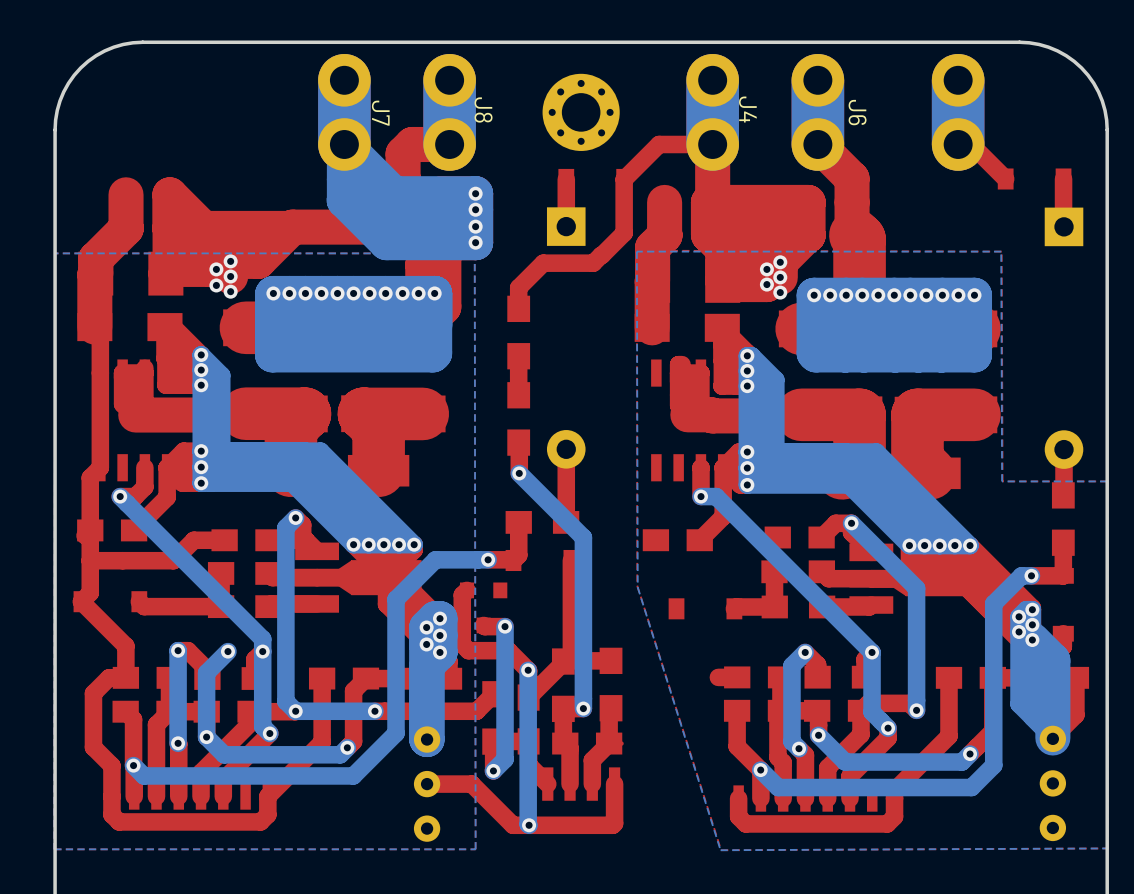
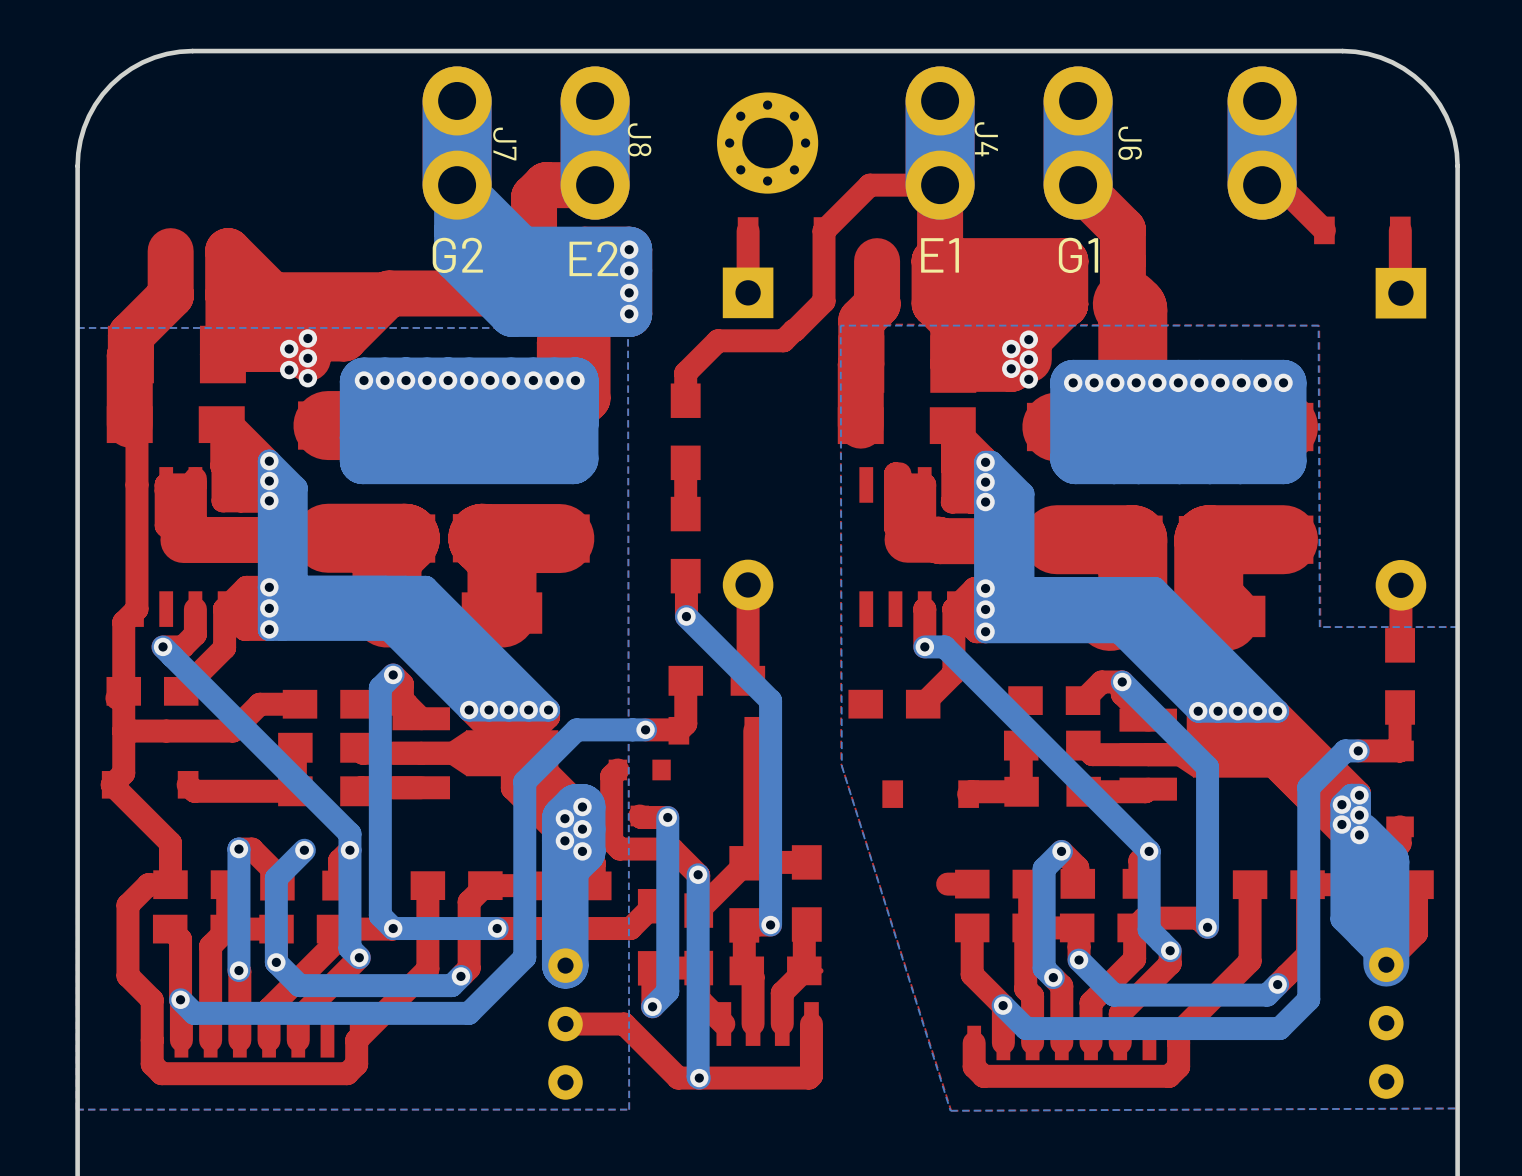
text: none -> G2 (457, 255)
text: none -> E1 (940, 255)
text: none -> G1 (1078, 255)
text: none -> E2 (593, 258)

